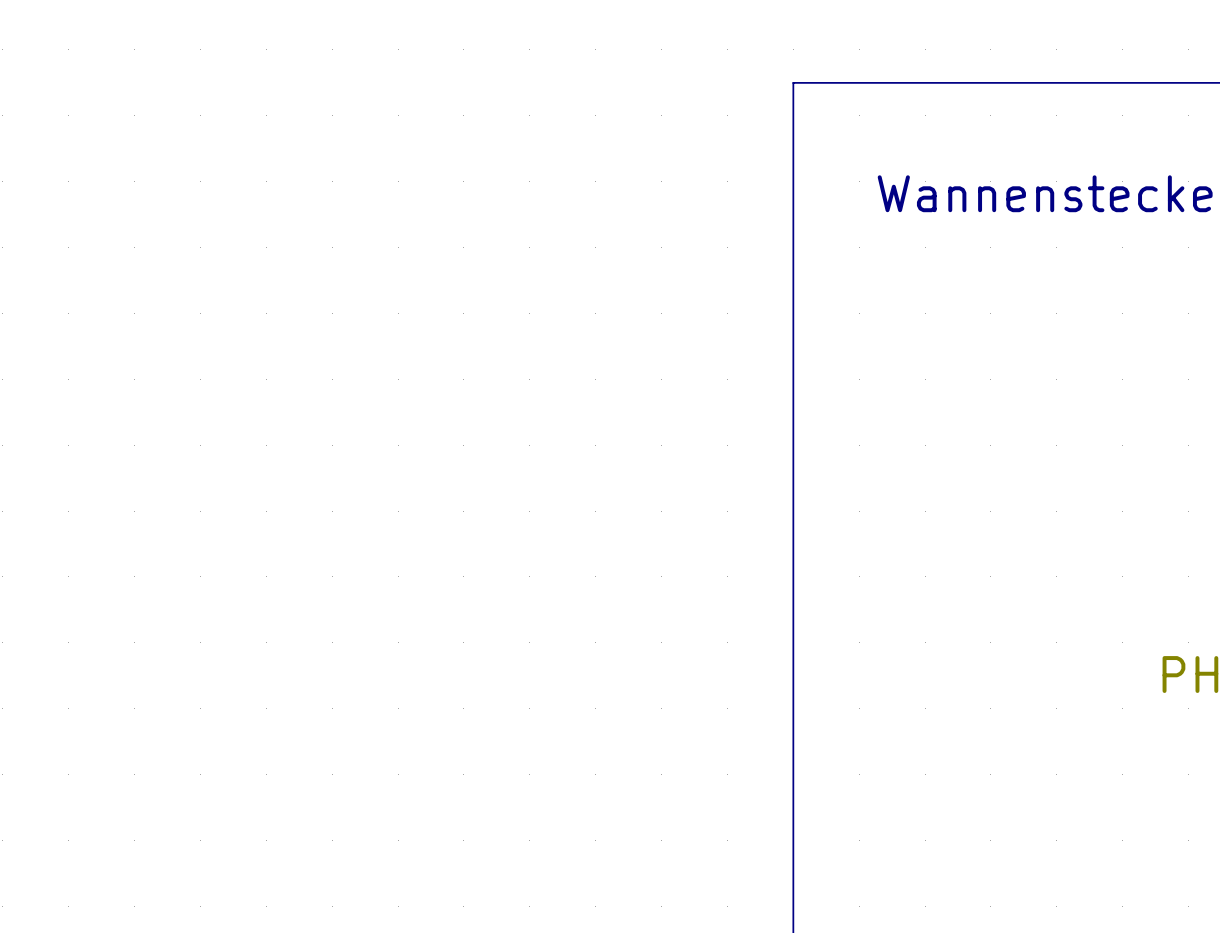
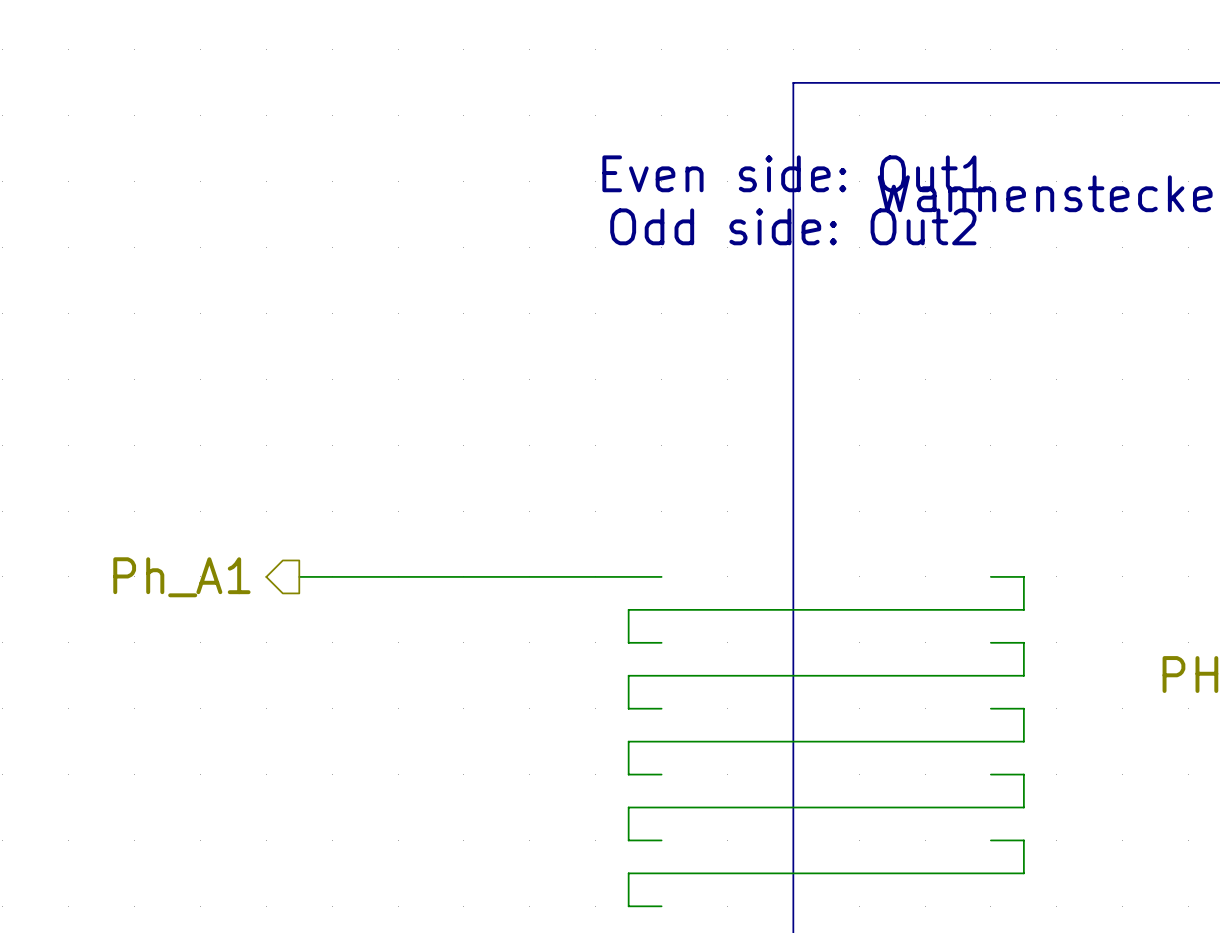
text: none -> Even side: Out1 (794, 173)
text: none -> Odd side: Out2 (793, 226)
wire: none -> (299, 576) (661, 576)
wire: none -> (990, 576) (1023, 576) (1023, 609) (628, 609) (628, 642) (661, 642)
hierarchical label: none -> Ph_A1 (181, 577)
wire: none -> (990, 642) (1023, 642) (1023, 675) (628, 675) (628, 708) (661, 708)
wire: none -> (990, 708) (1023, 708) (1023, 741) (628, 741) (628, 774) (661, 774)
wire: none -> (990, 774) (1023, 774) (1023, 807) (628, 807) (628, 840) (661, 840)
wire: none -> (990, 840) (1023, 840) (1023, 873) (628, 873) (628, 906) (661, 906)

